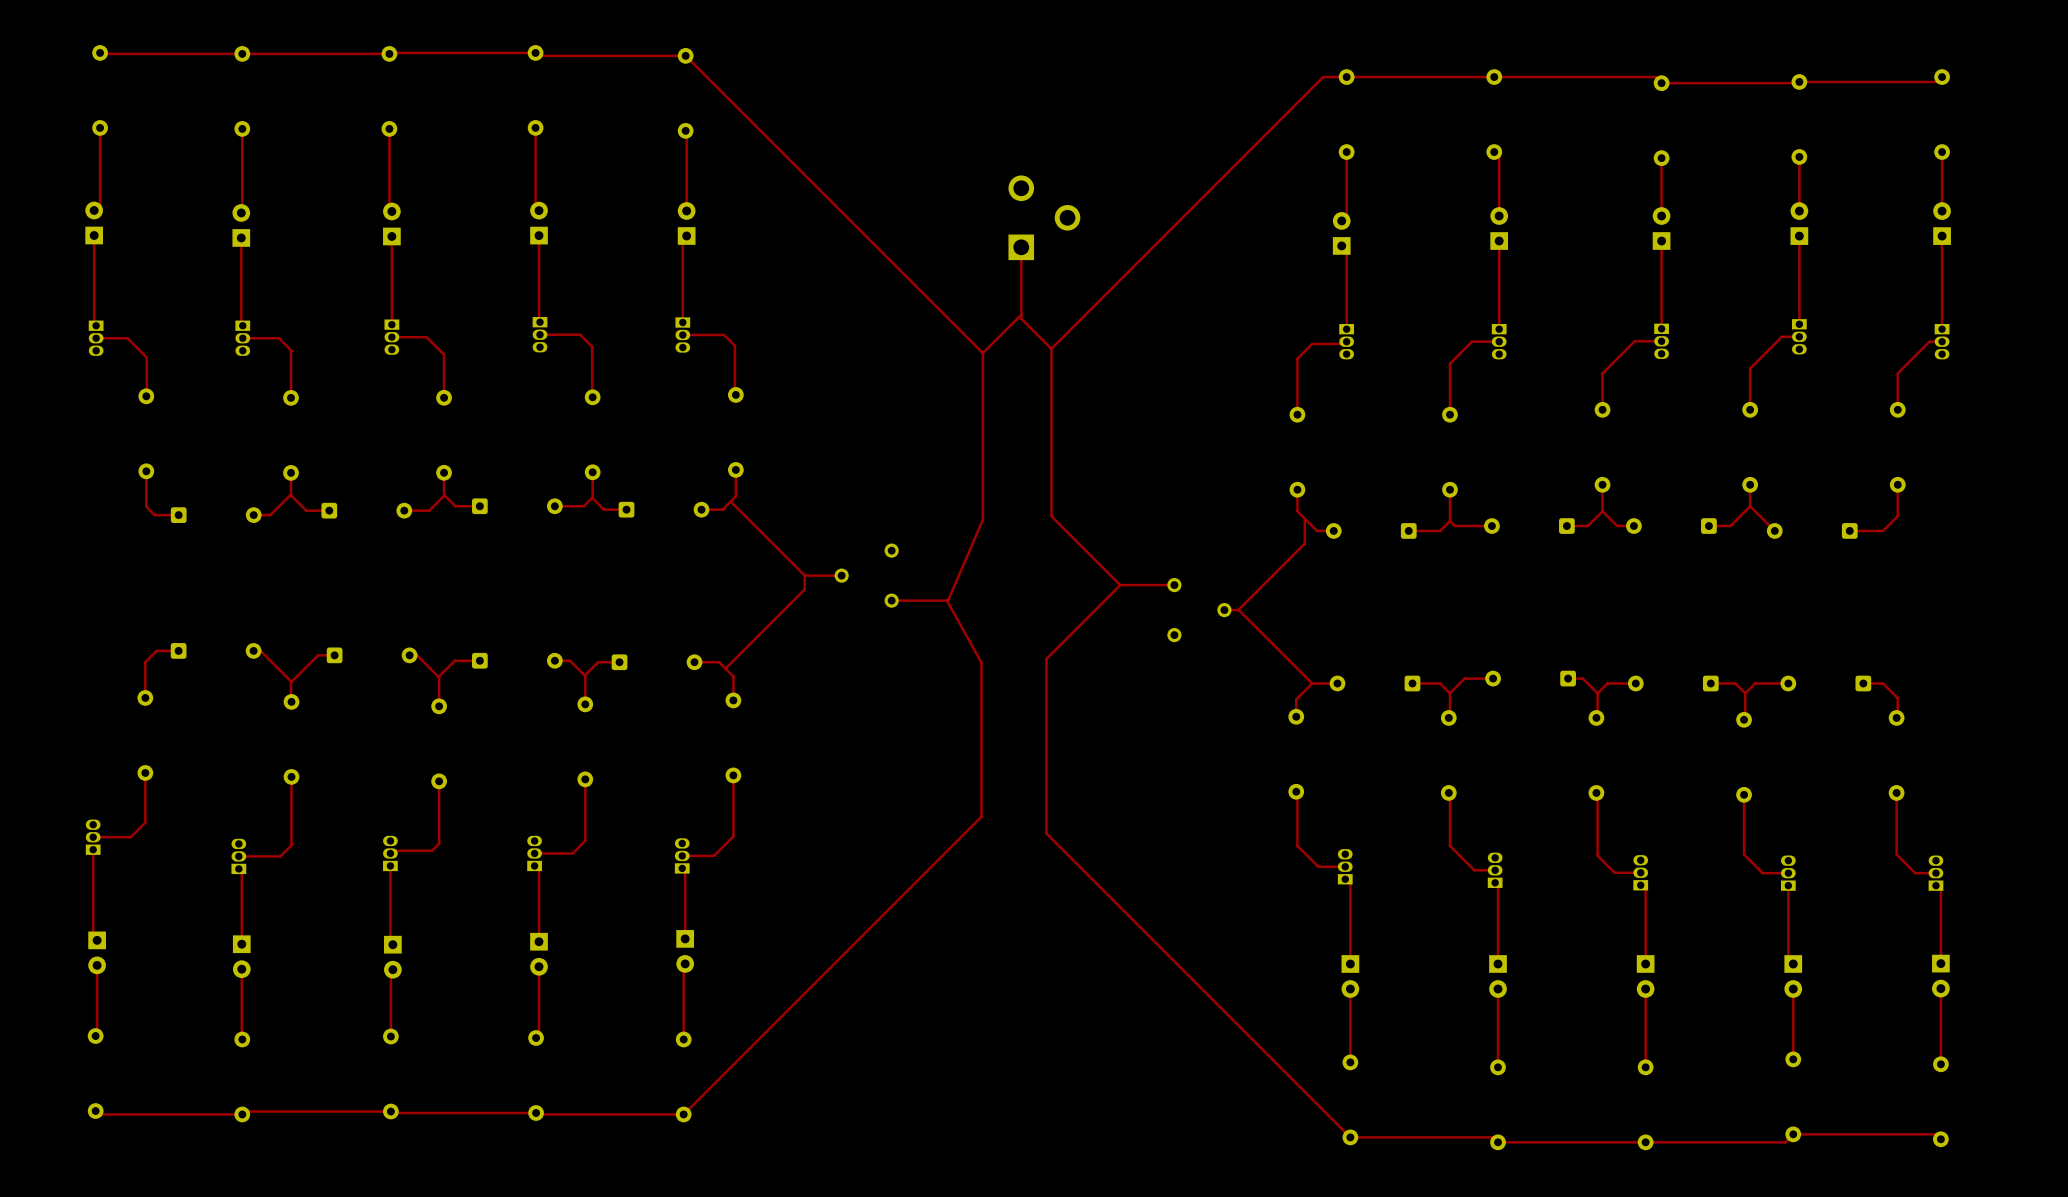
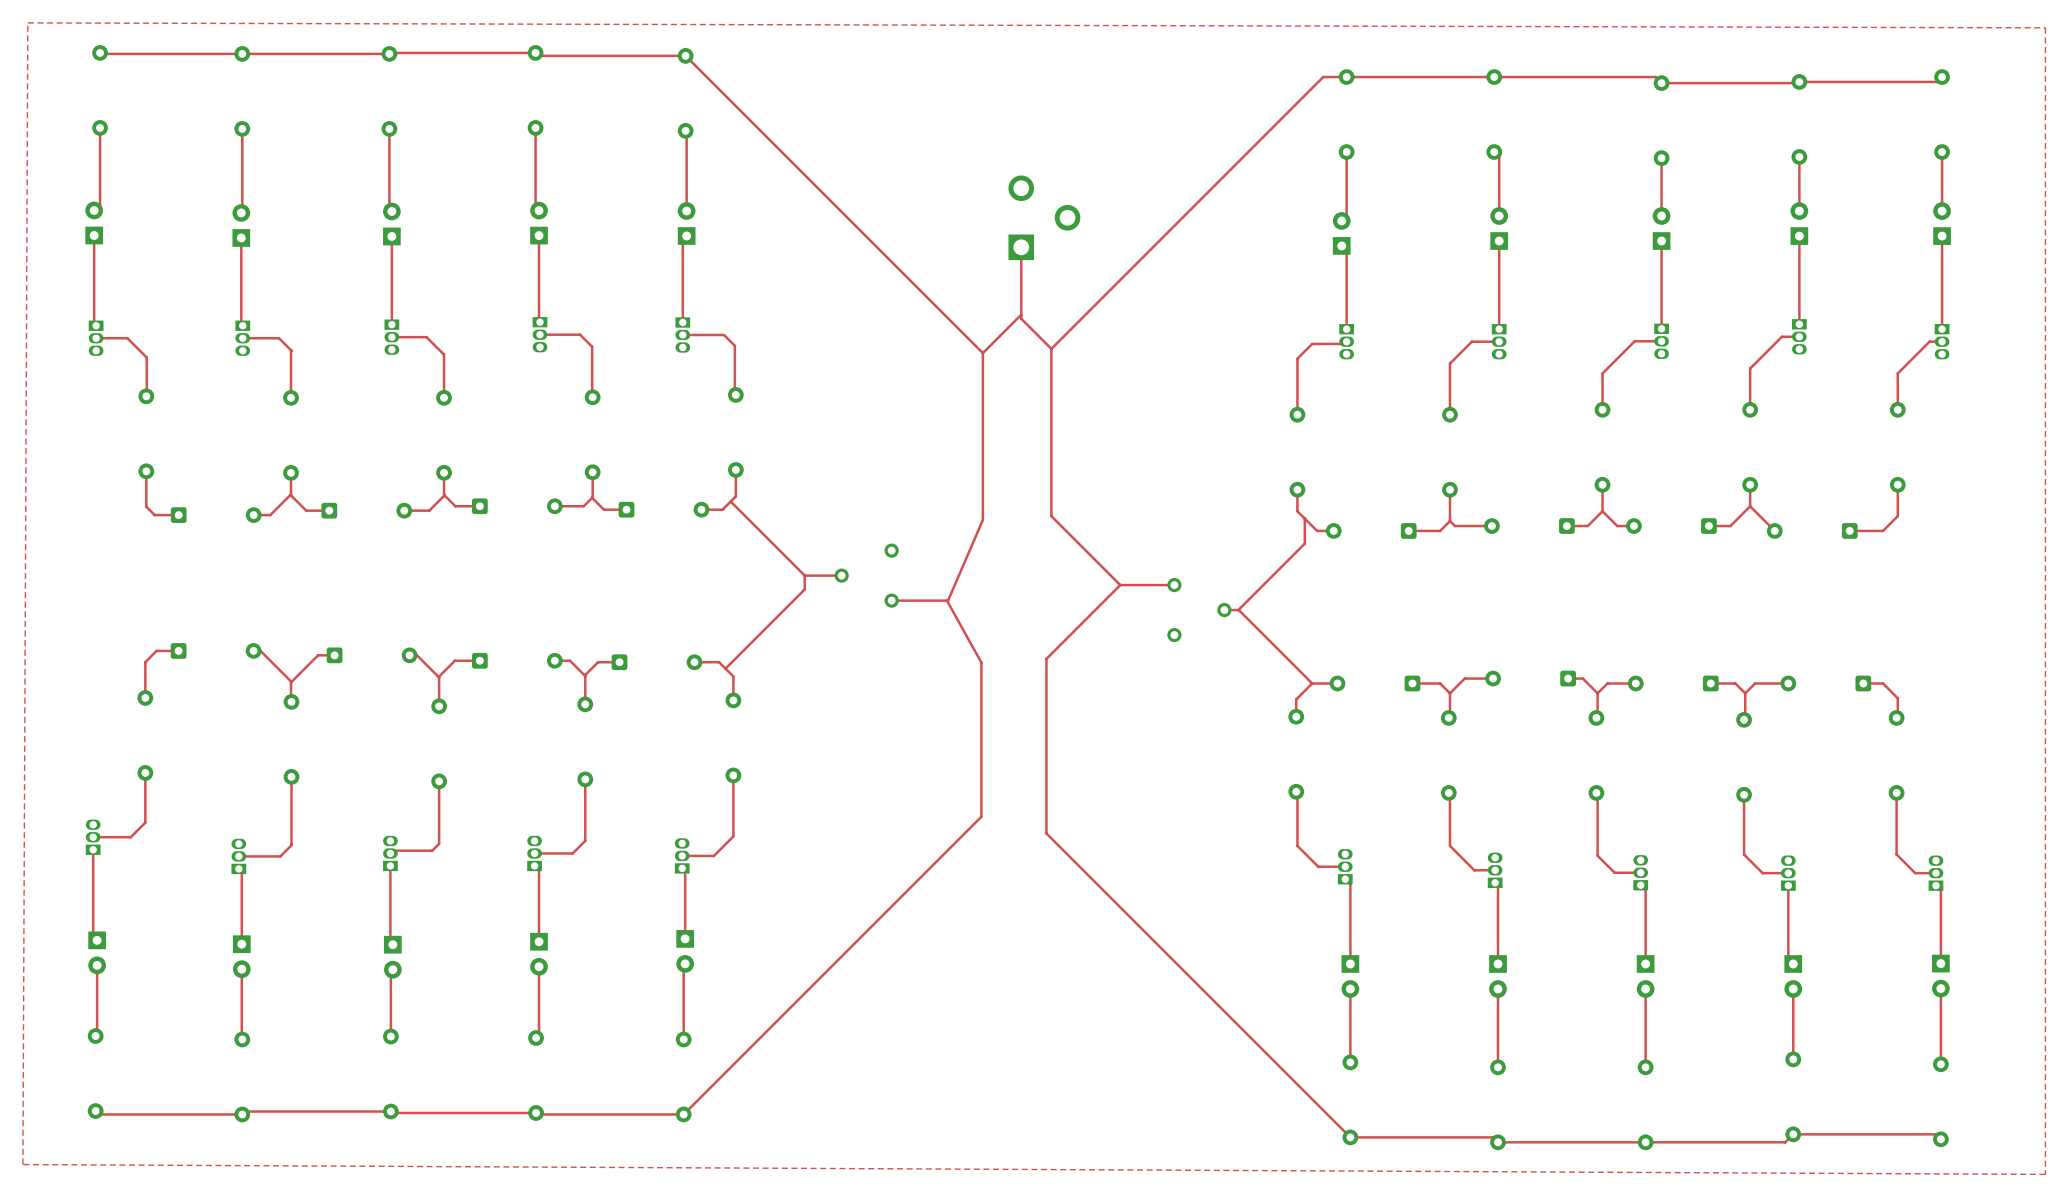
top zone outline: none -> (27, 22) (22, 1164) (2045, 1174) (2045, 27) (27, 22)

